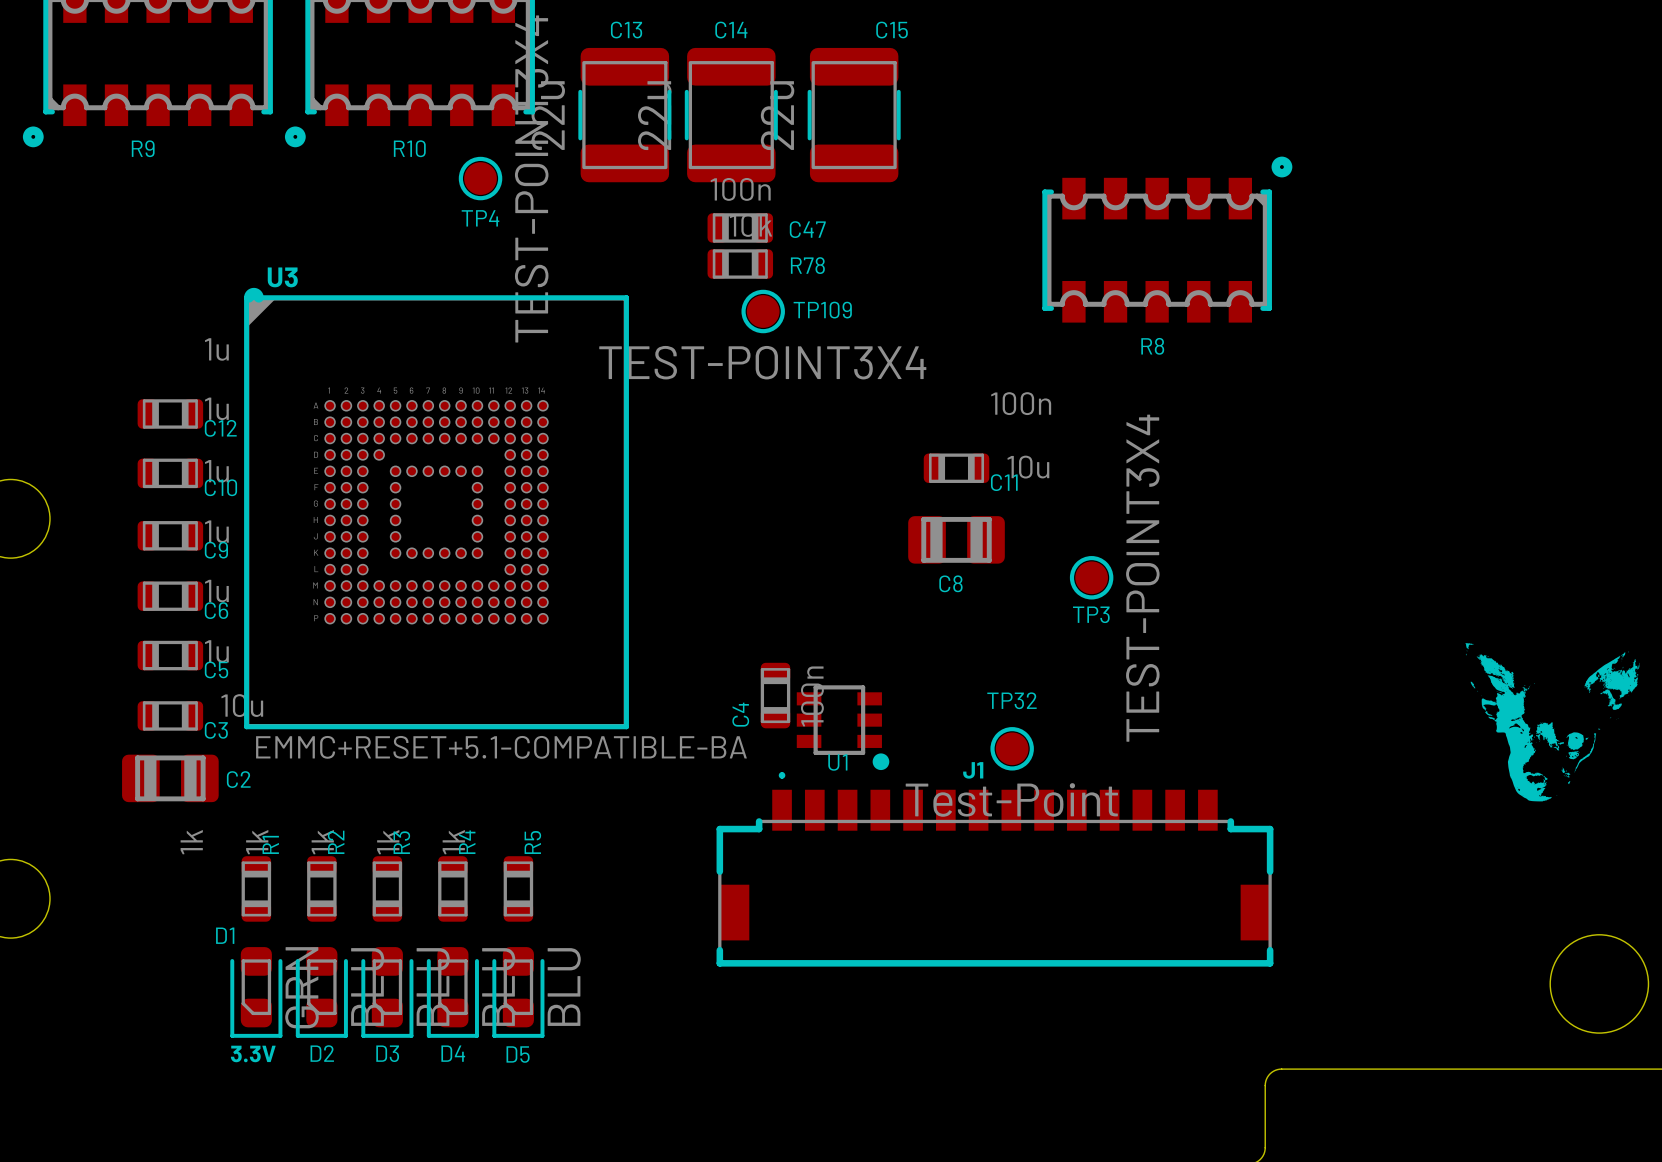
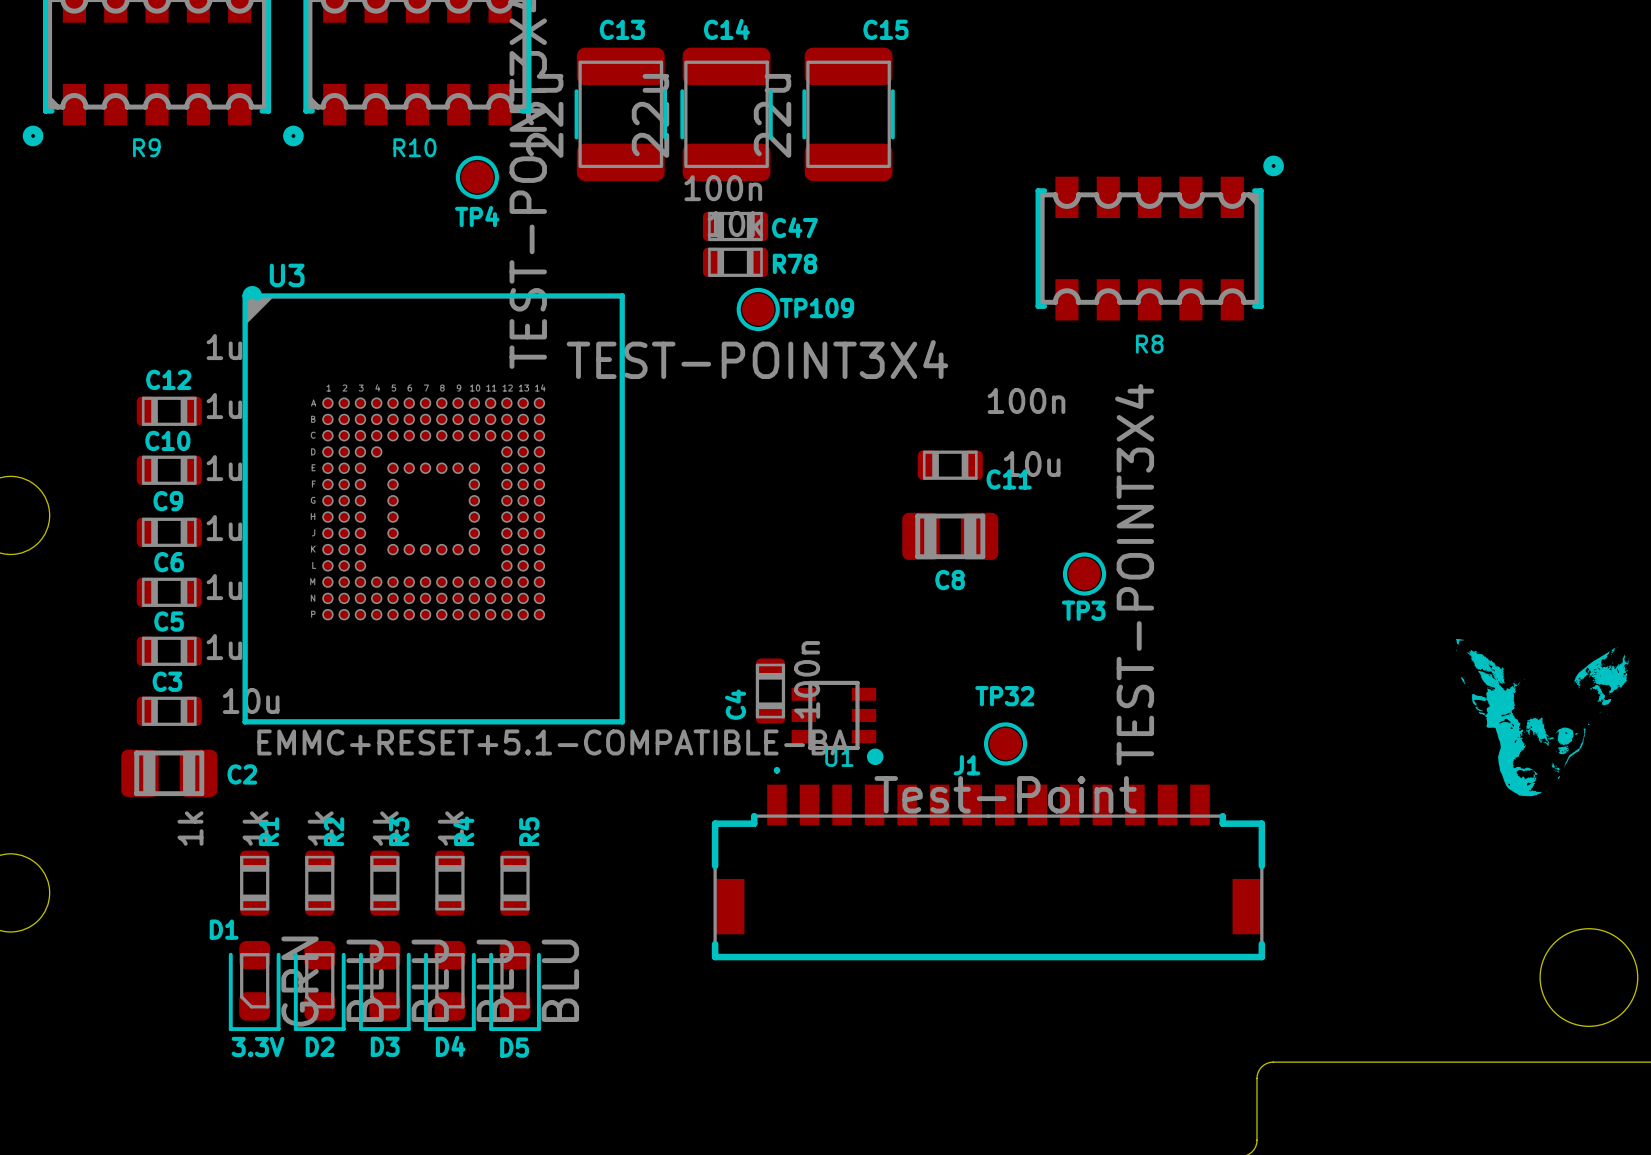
C12 name position: C12 (220, 428) -> C12 (168, 379)
C10 name position: C10 (220, 487) -> C10 (167, 440)
C9 name position: C9 (216, 550) -> C9 (168, 501)
C6 name position: C6 (216, 610) -> C6 (169, 562)
C5 name position: C5 (216, 669) -> C5 (169, 621)
C3 name position: C3 (216, 730) -> C3 (167, 681)

